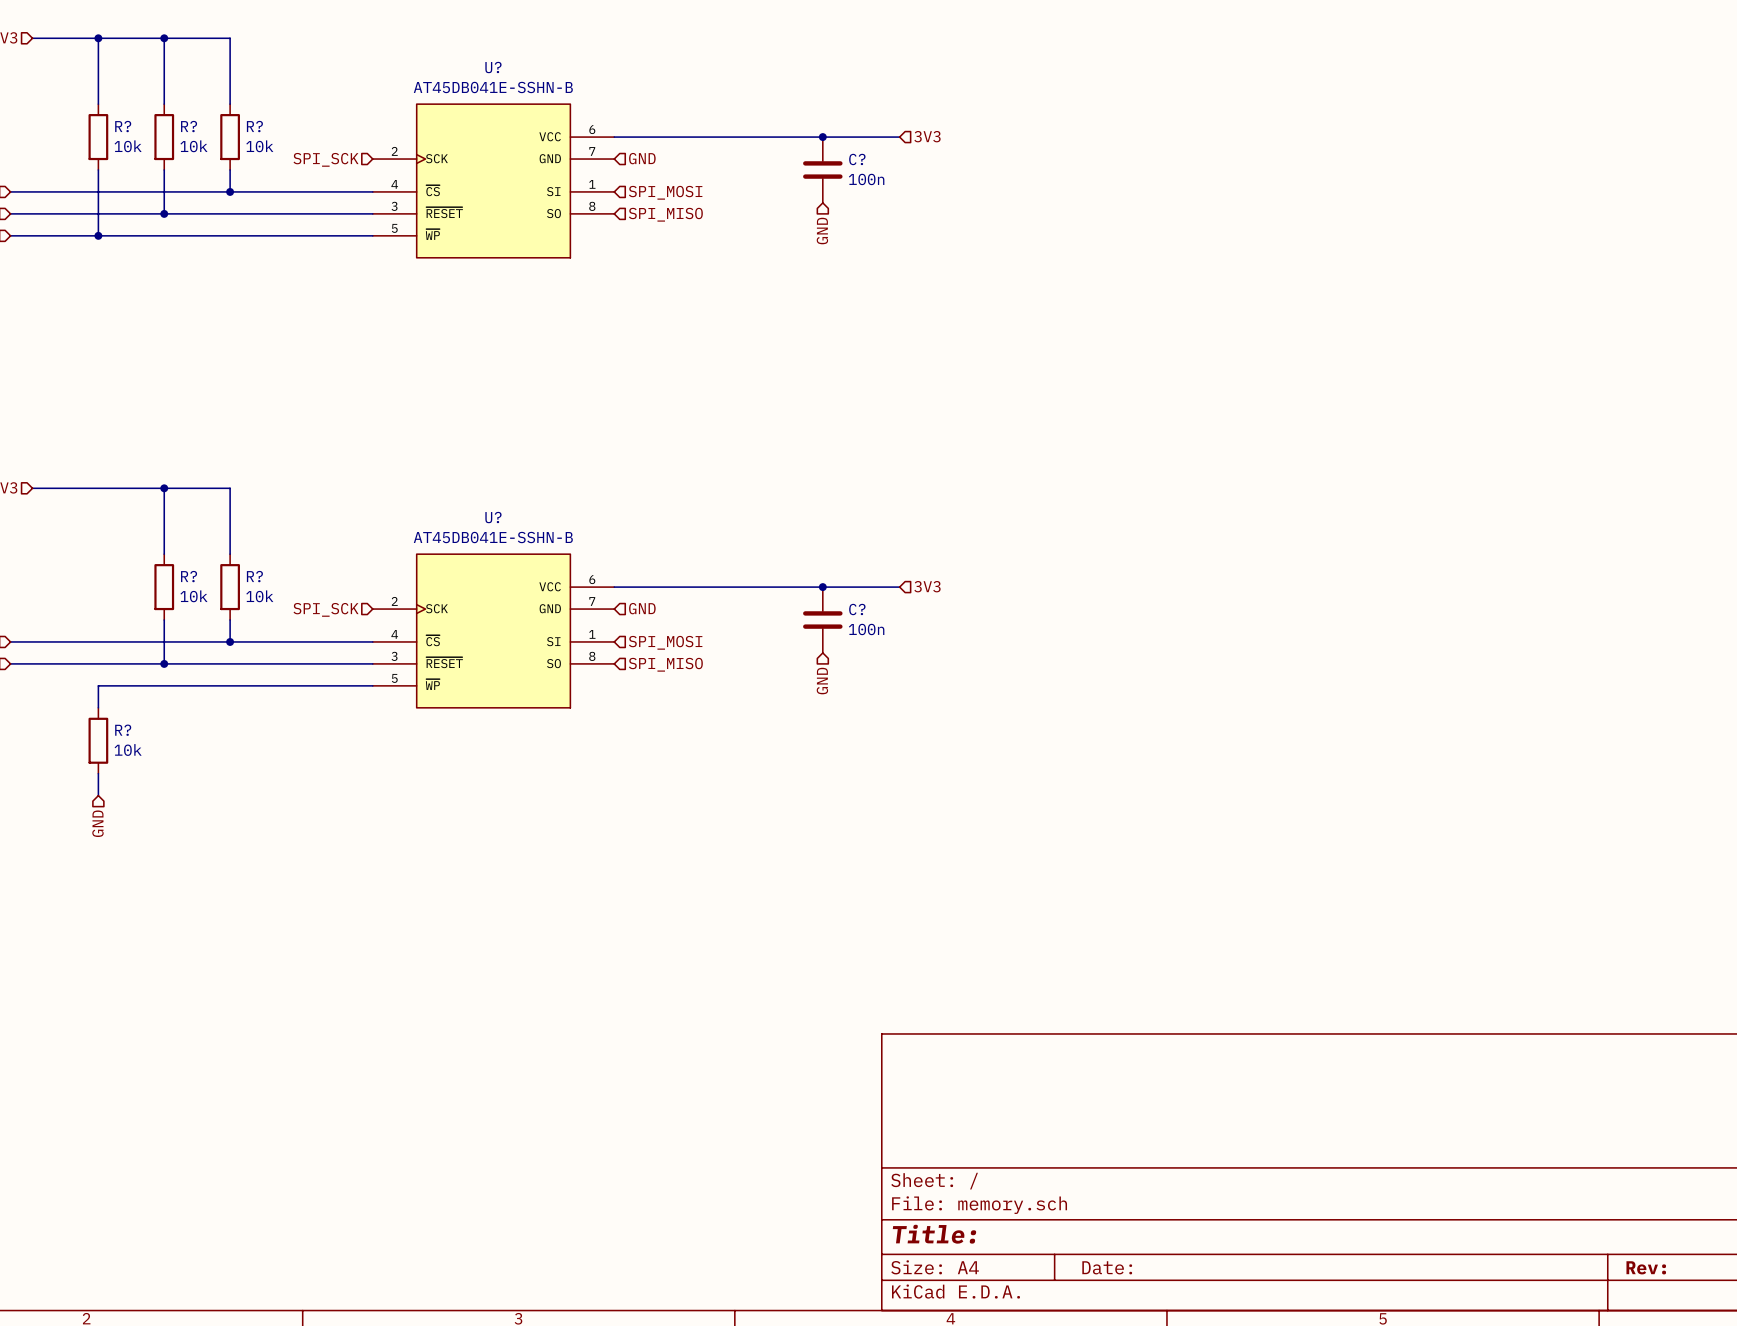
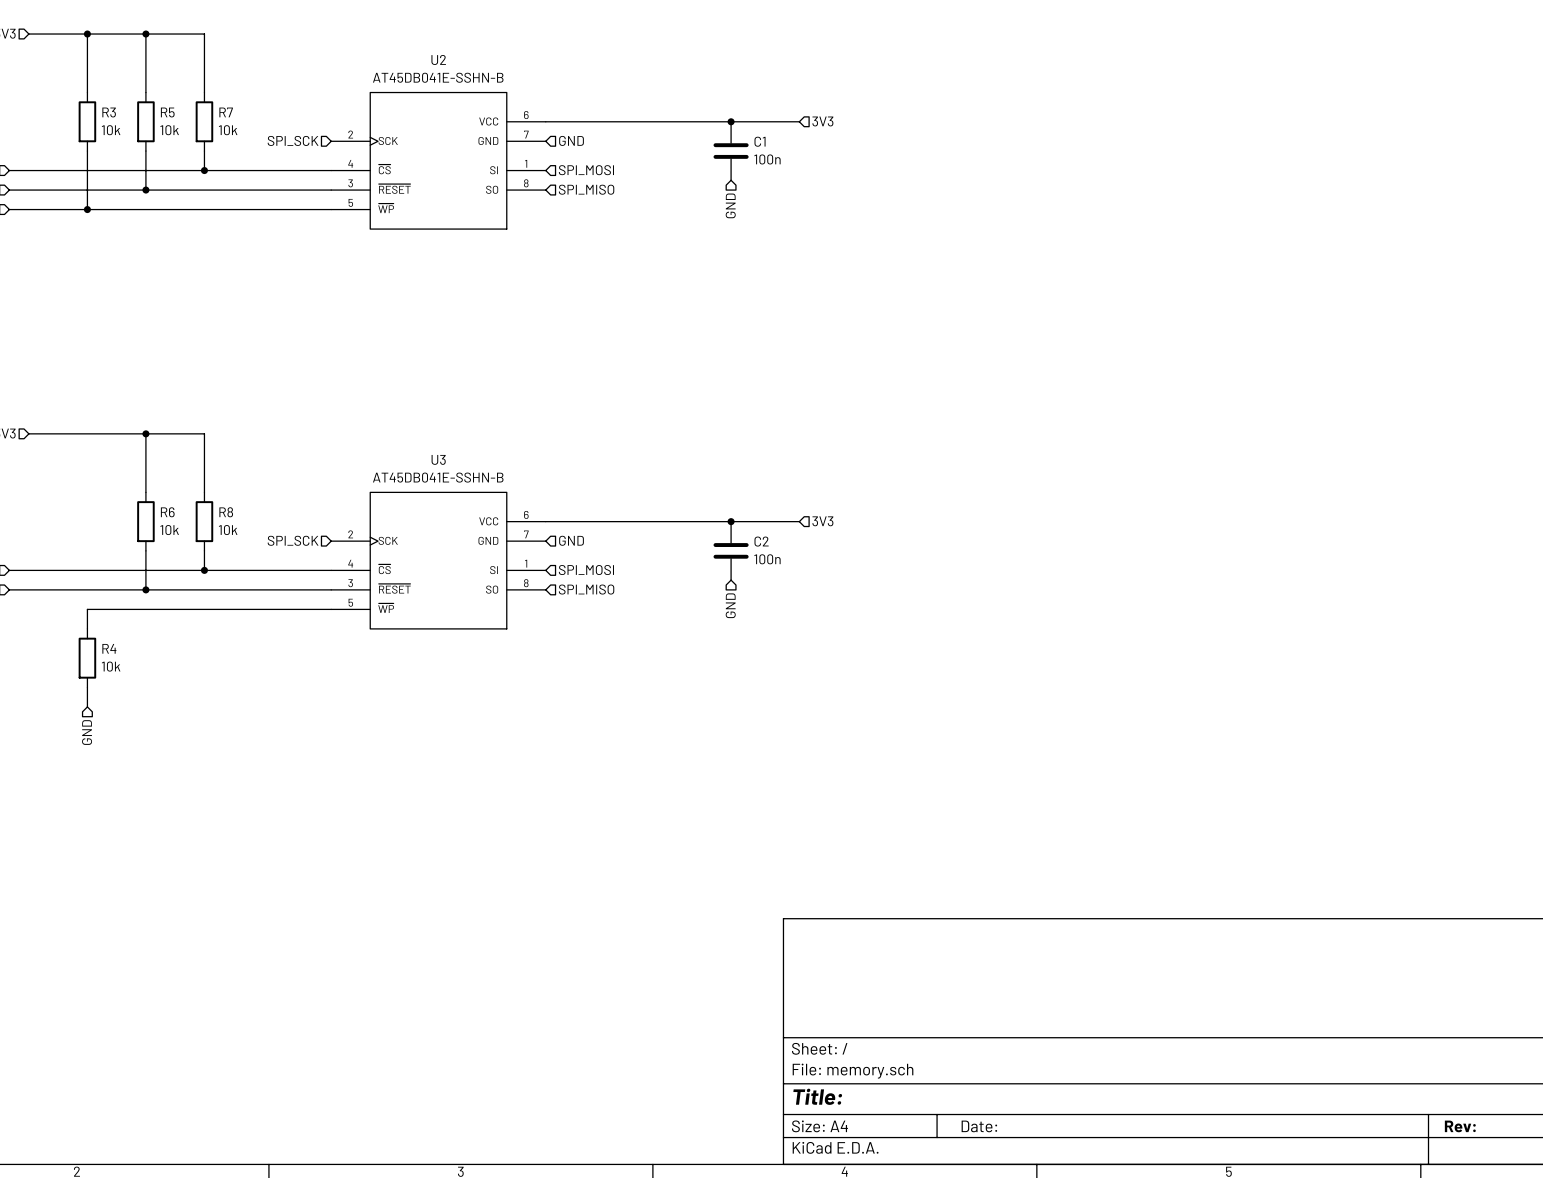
U? name: U? (493, 67) -> U2 (438, 59)
R? name: R? (123, 126) -> R3 (109, 112)
R? name: R? (189, 126) -> R5 (167, 112)
R? name: R? (254, 126) -> R7 (226, 112)
C? name: C? (857, 159) -> C1 (760, 141)
U? name: U? (493, 517) -> U3 (438, 459)
R? name: R? (189, 576) -> R6 (167, 512)
R? name: R? (254, 576) -> R8 (226, 512)
C? name: C? (857, 609) -> C2 (761, 541)
R? name: R? (123, 730) -> R4 (109, 648)

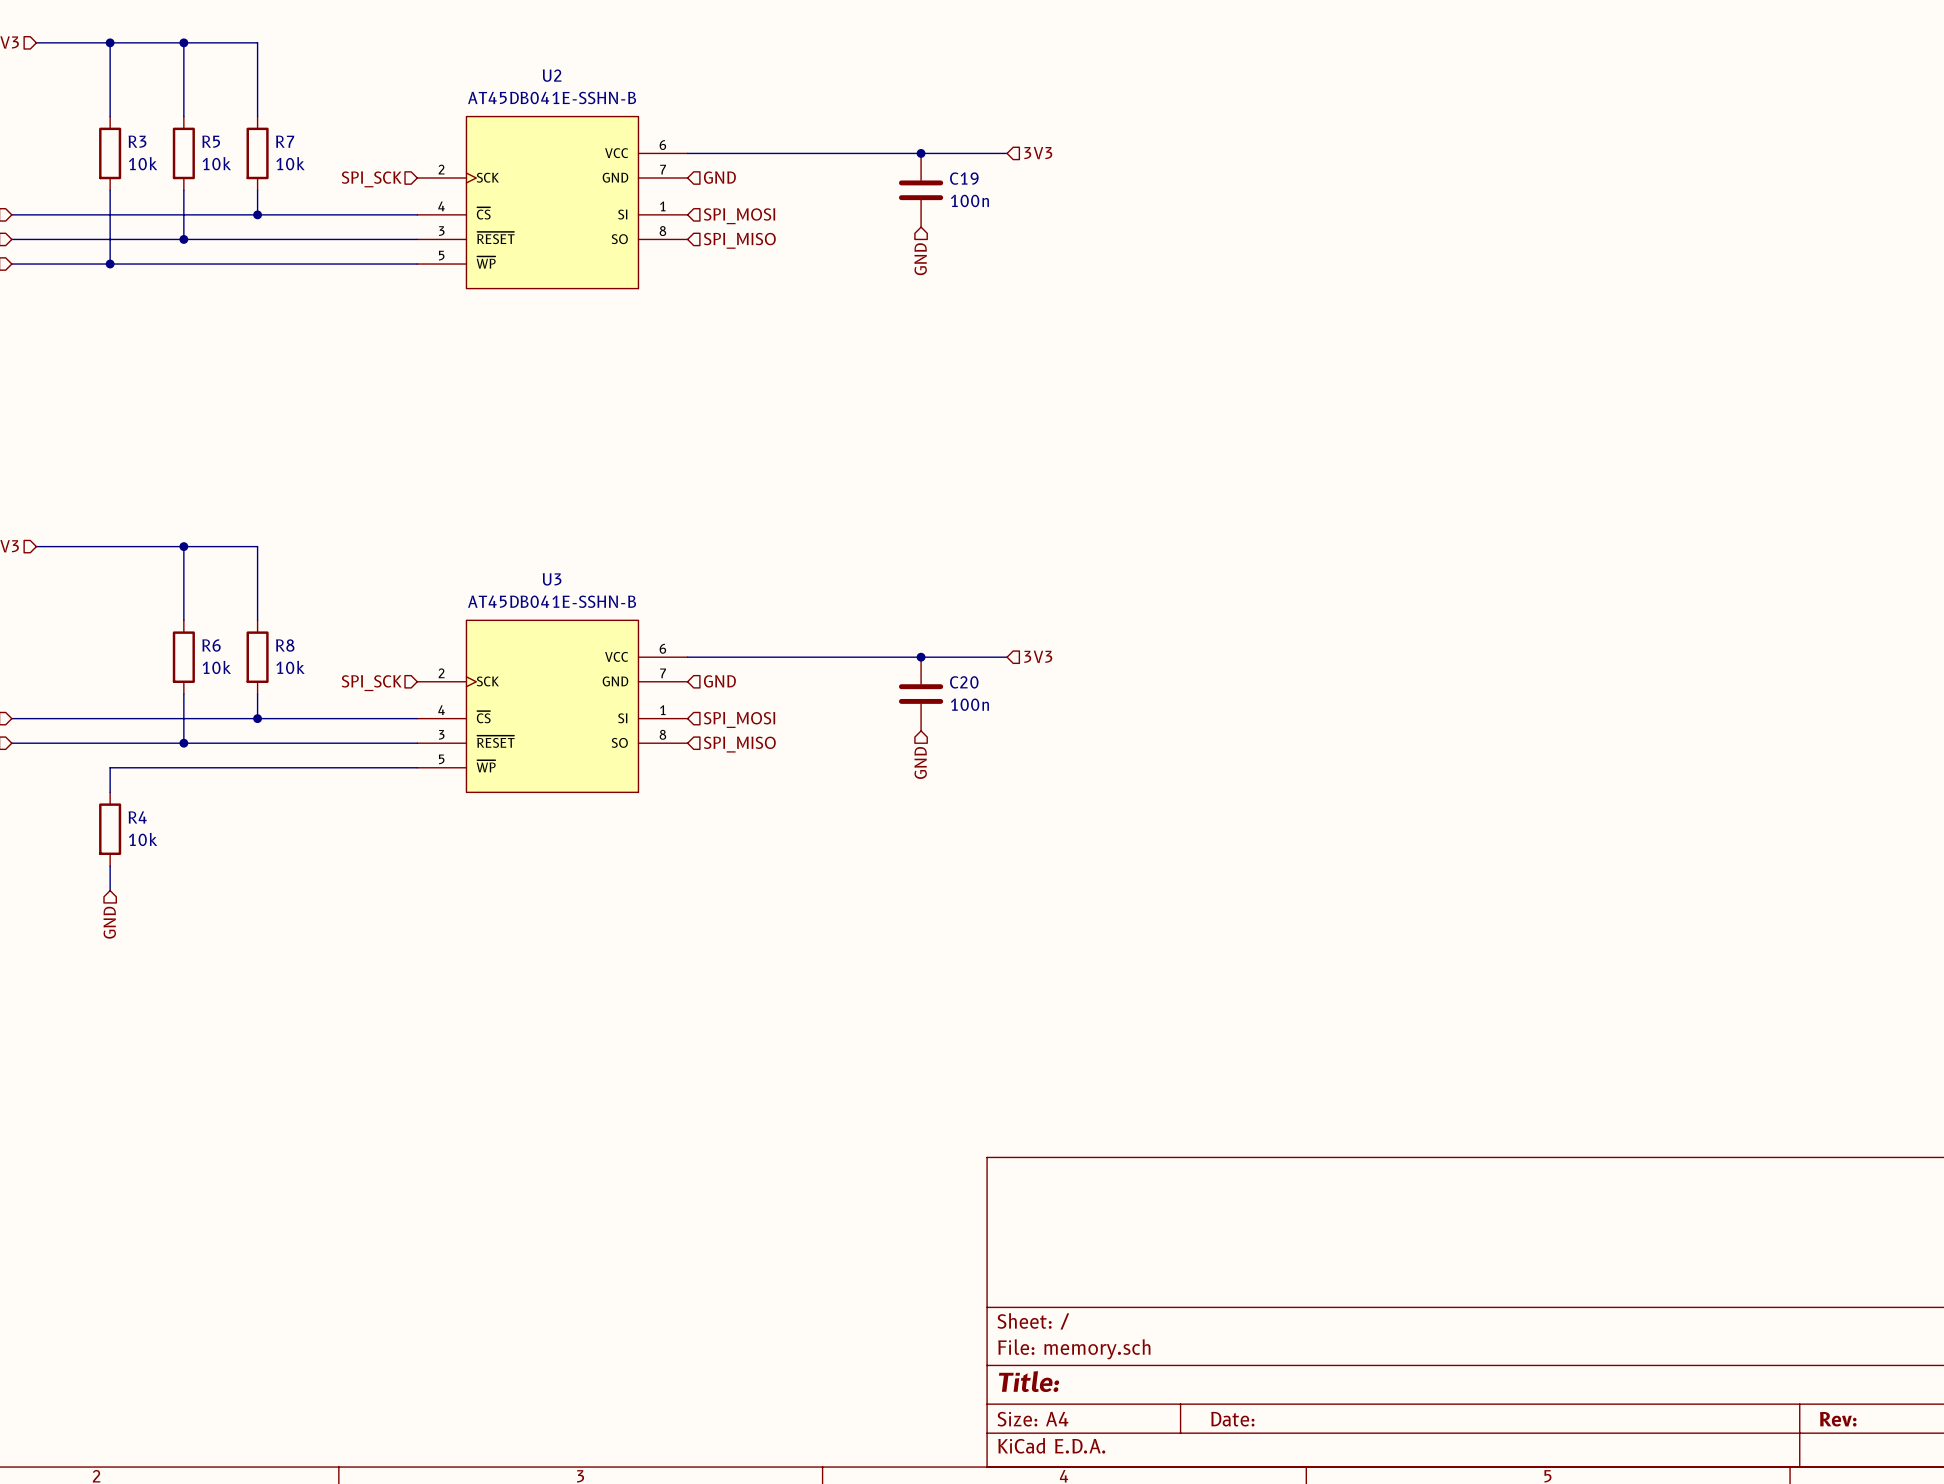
C1 name: C1 (760, 141) -> C19 (964, 178)
C2 name: C2 (761, 541) -> C20 (964, 682)

